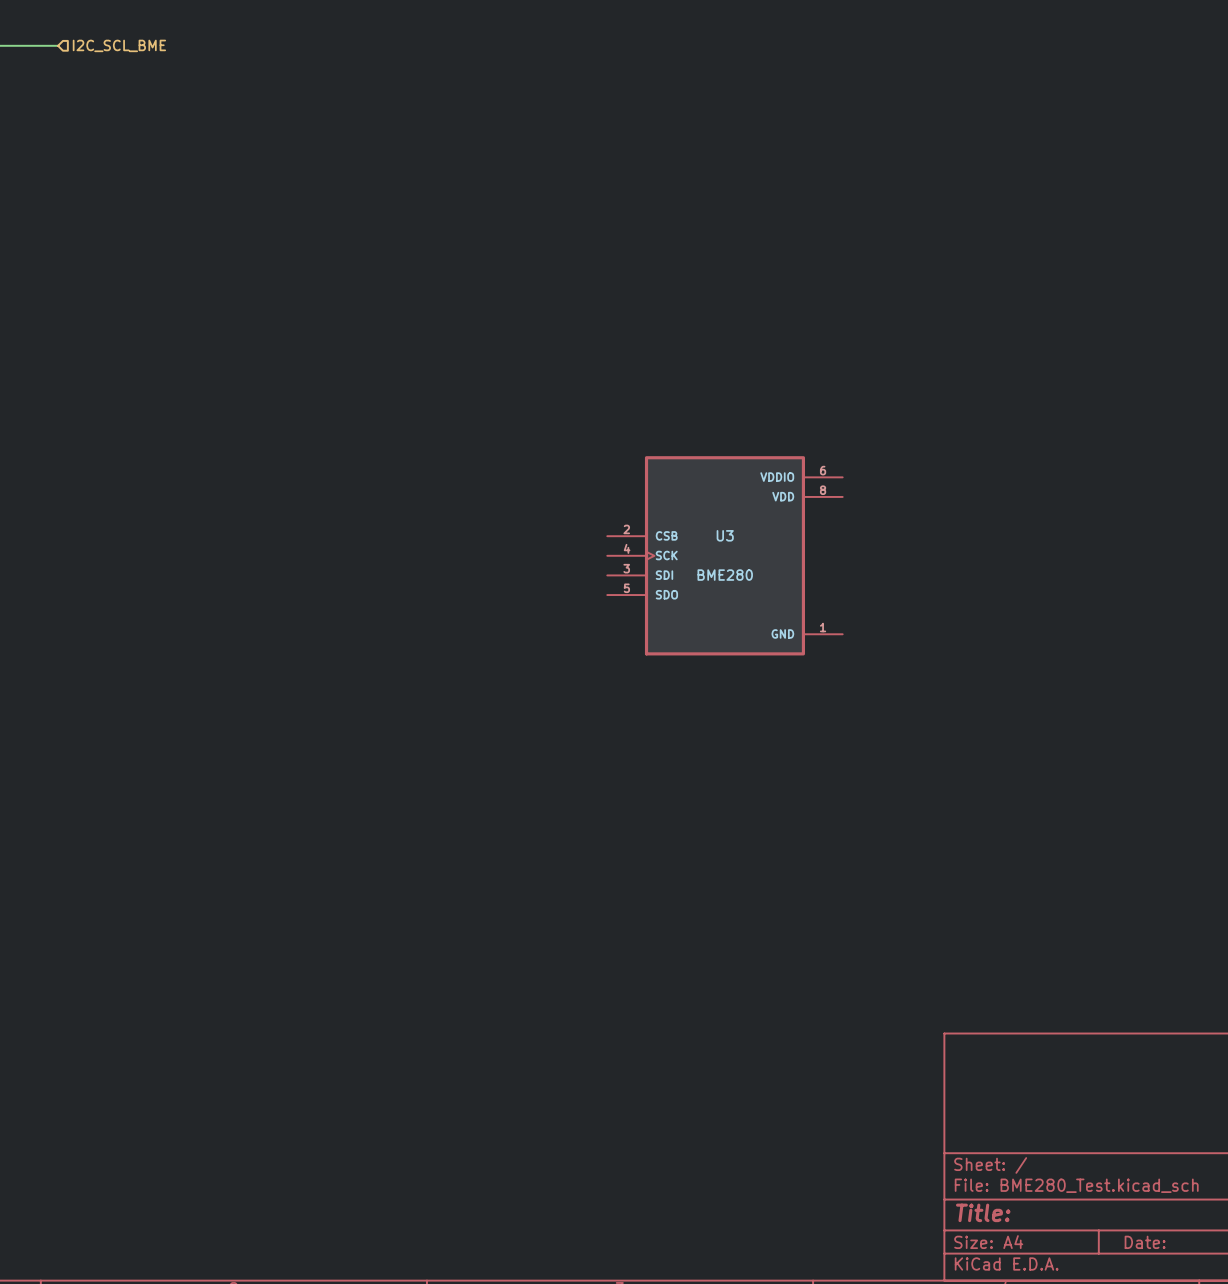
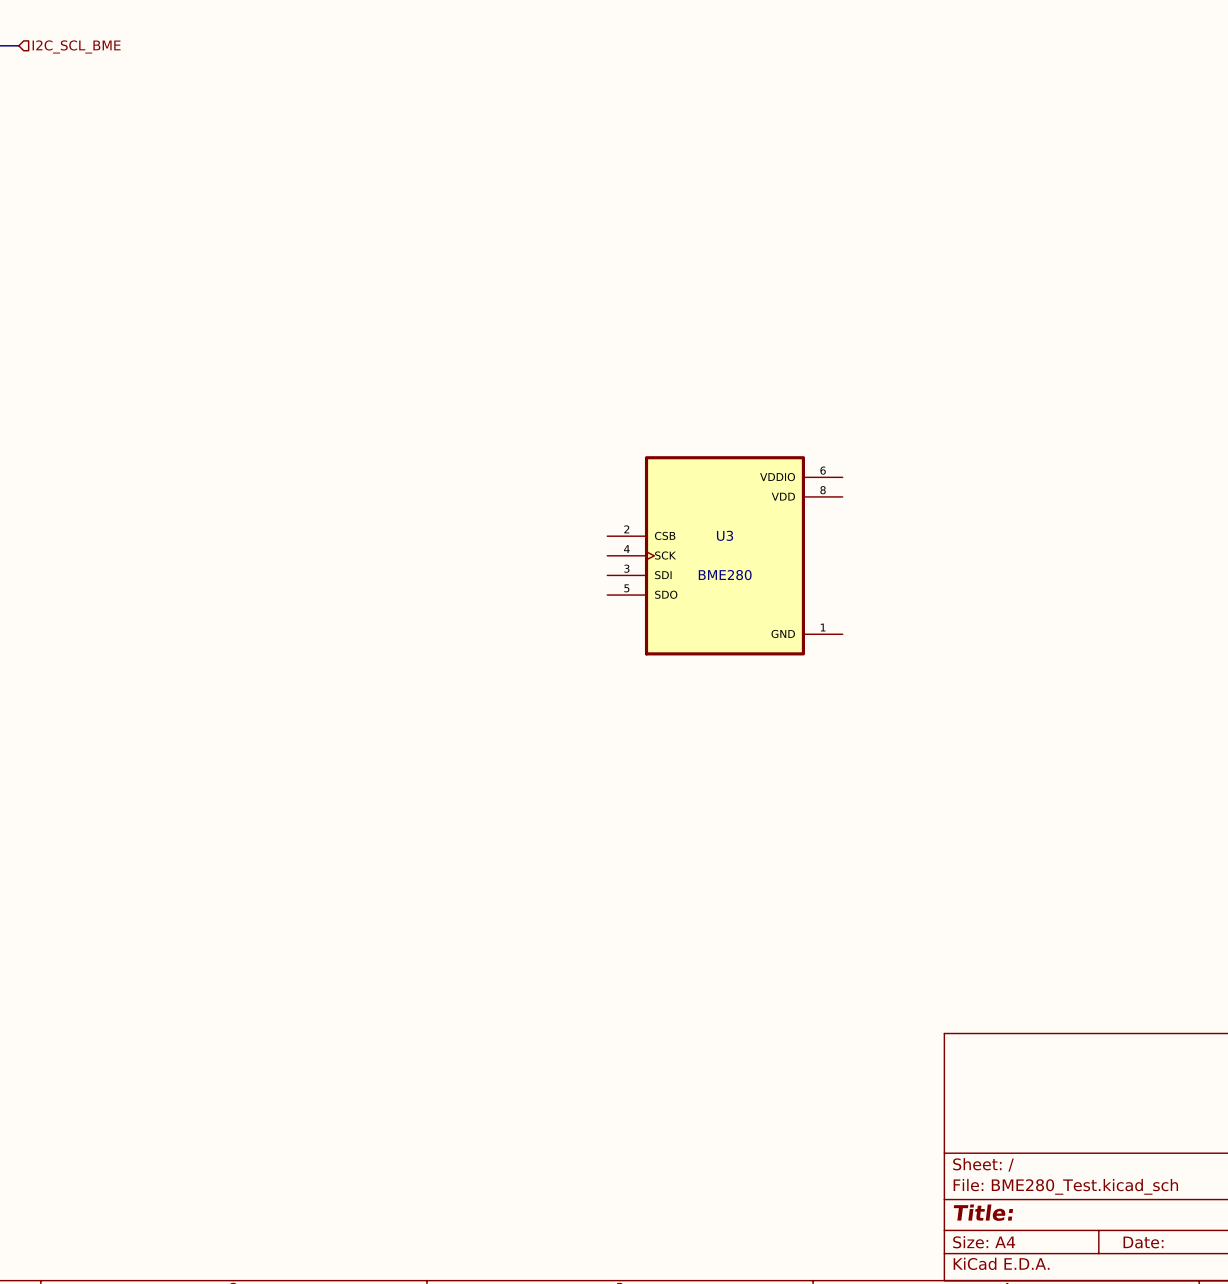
wire: (18, 45) (58, 45) -> none
hierarchical label position: I2C_SCL_BME (119, 45) -> I2C_SCL_BME (76, 46)

